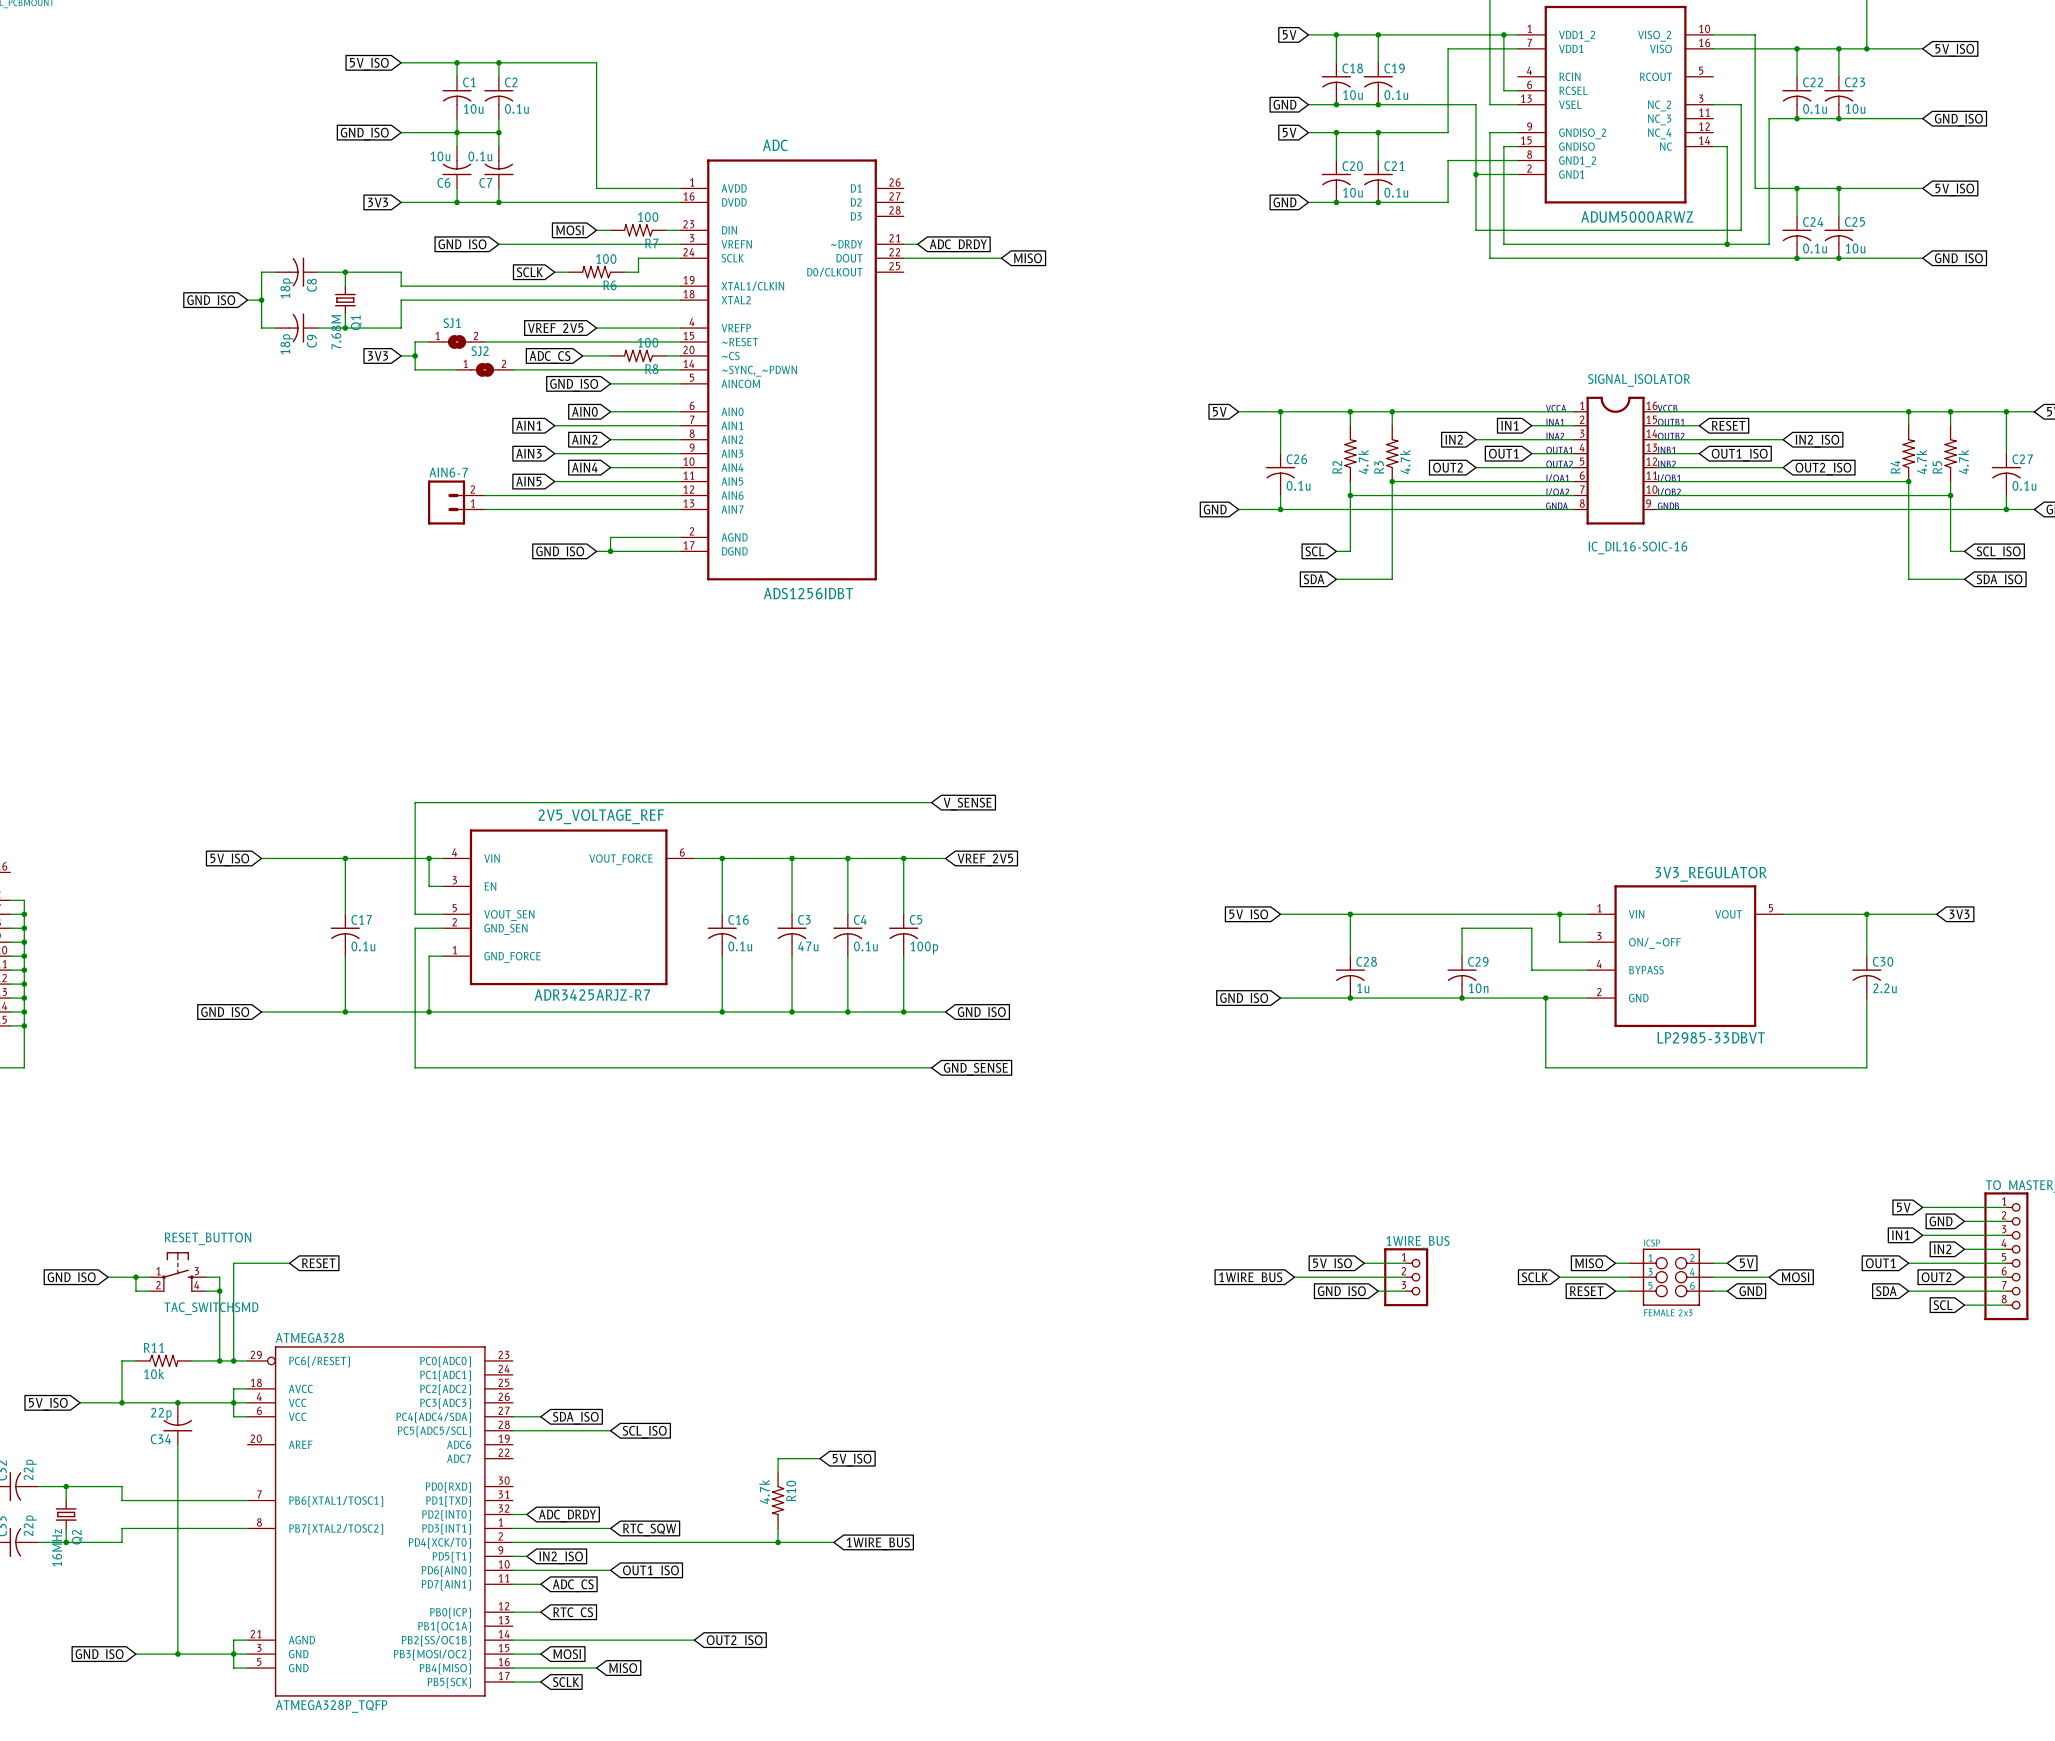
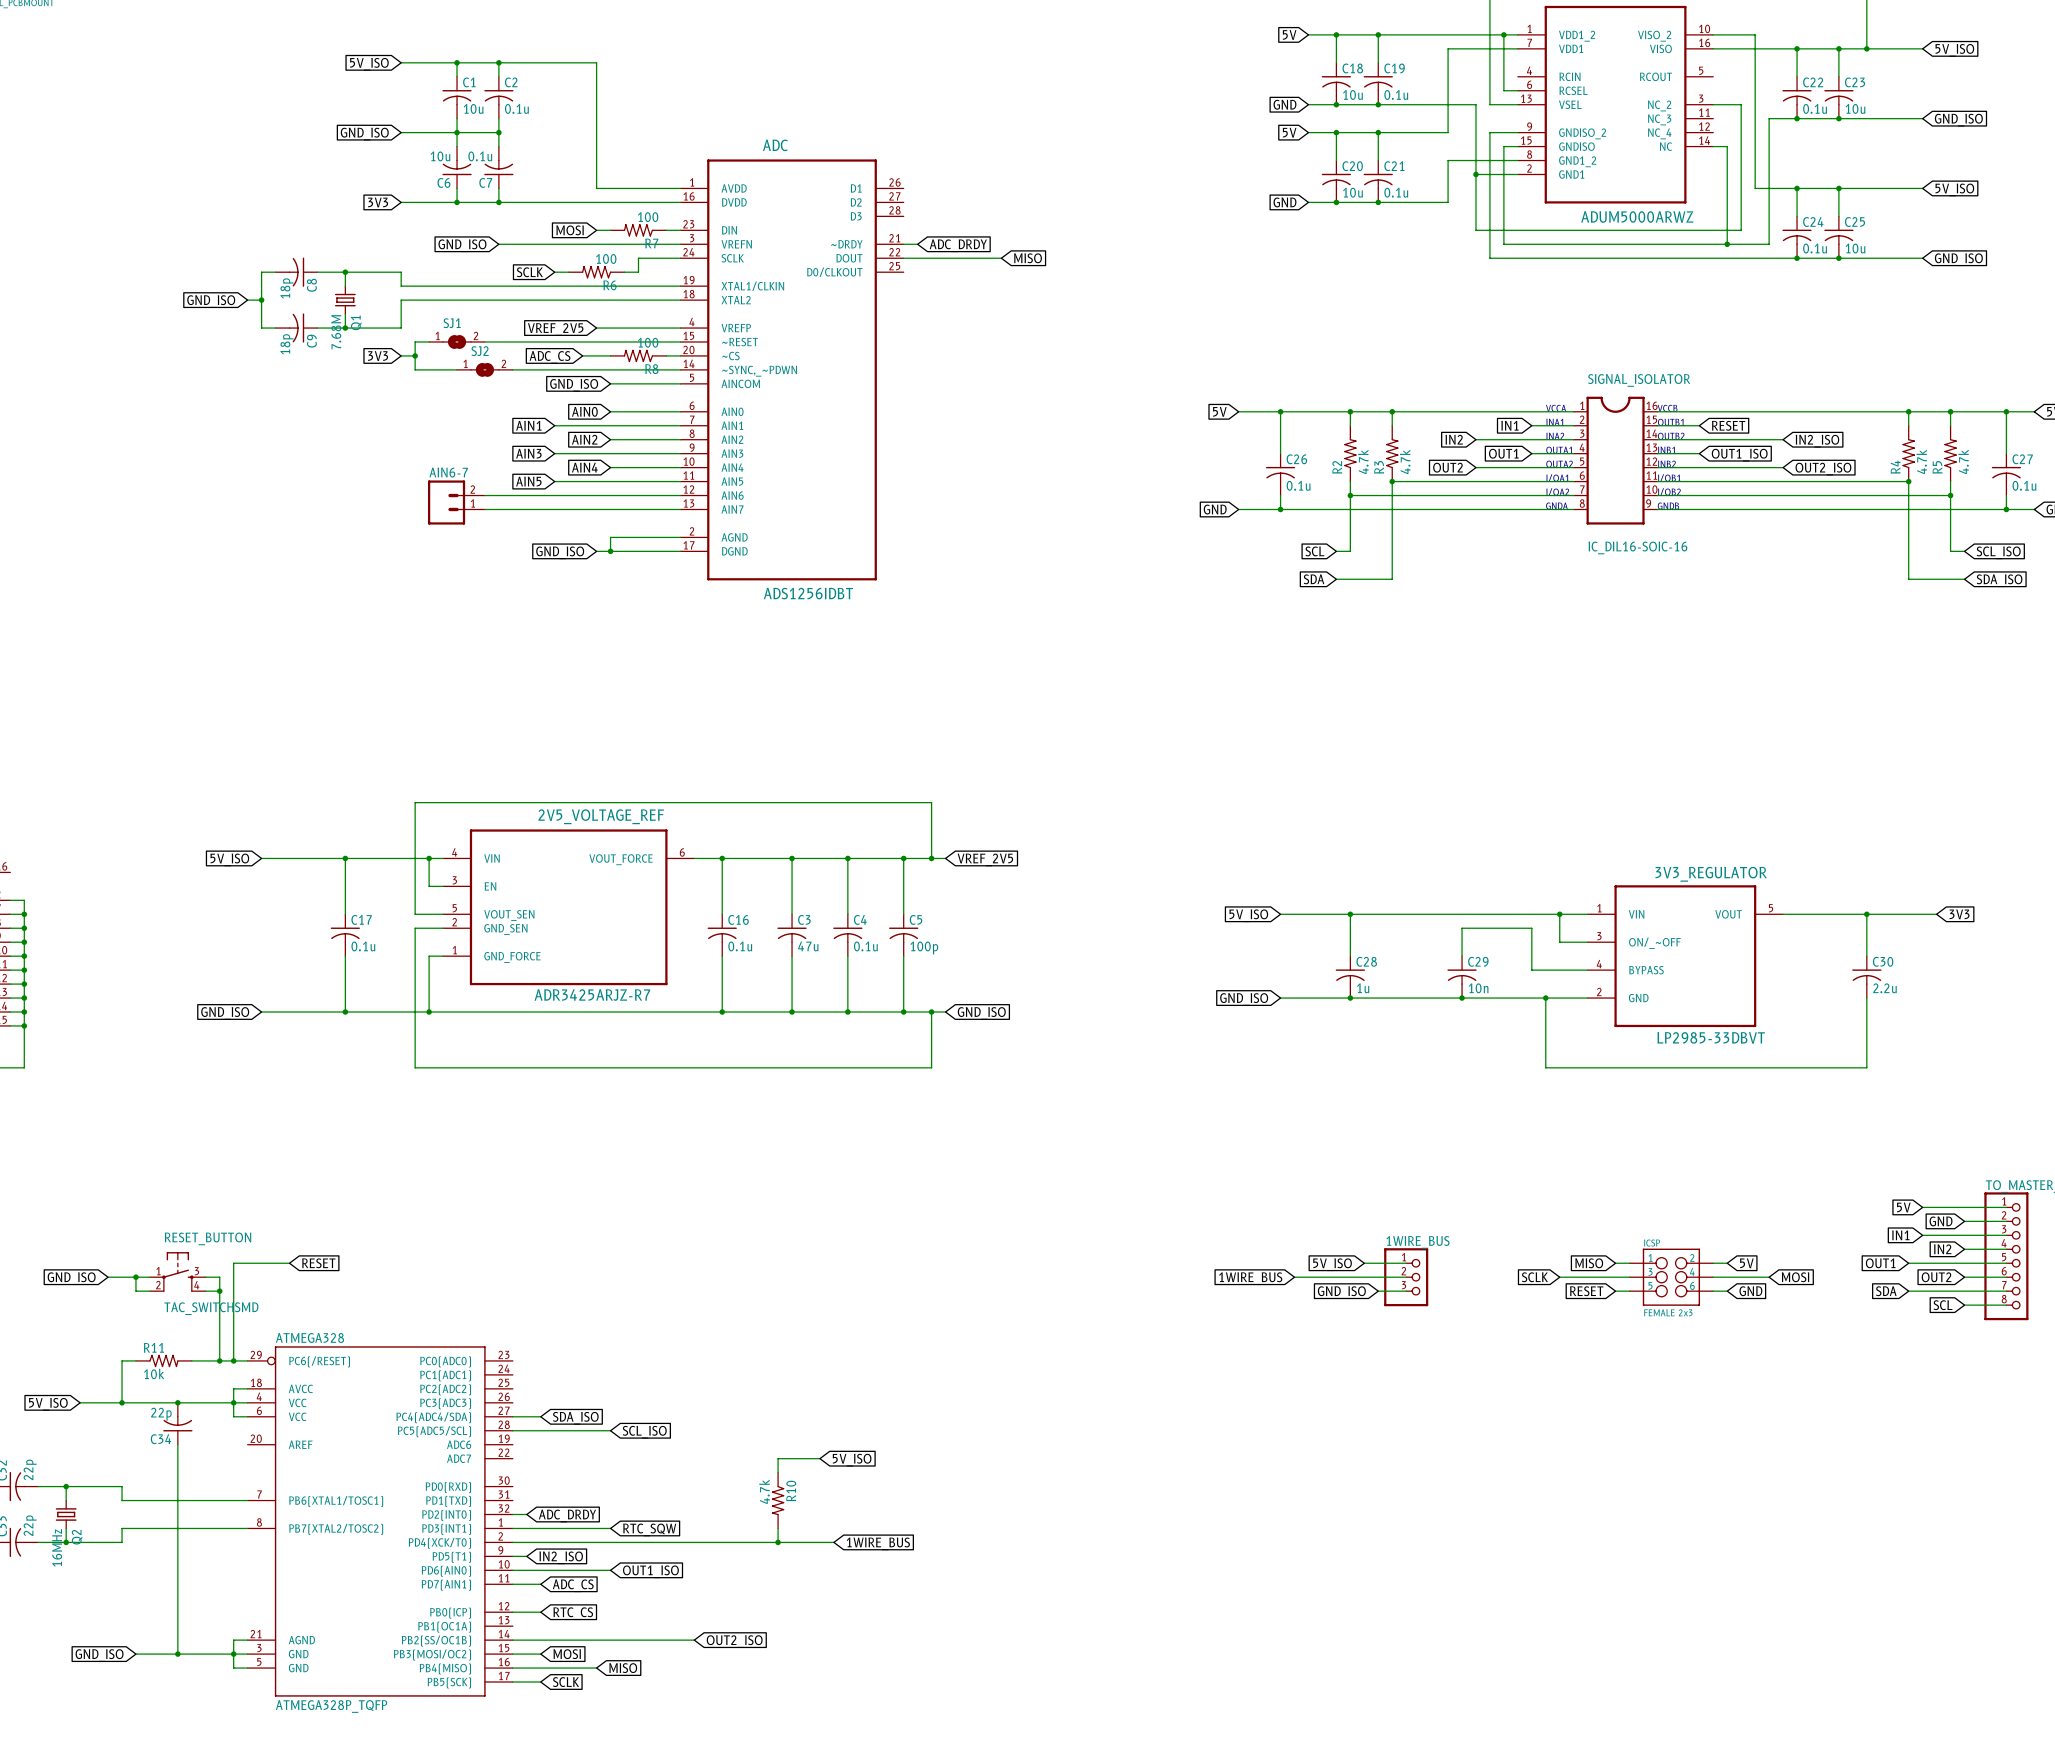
wire: none -> (931, 802) (931, 858)
global label: V_SENSE (967, 804) -> none
junction: none -> (931, 858)
wire: none -> (931, 1011) (931, 1067)
junction: none -> (931, 1011)
global label: GND_SENSE (975, 1069) -> none

